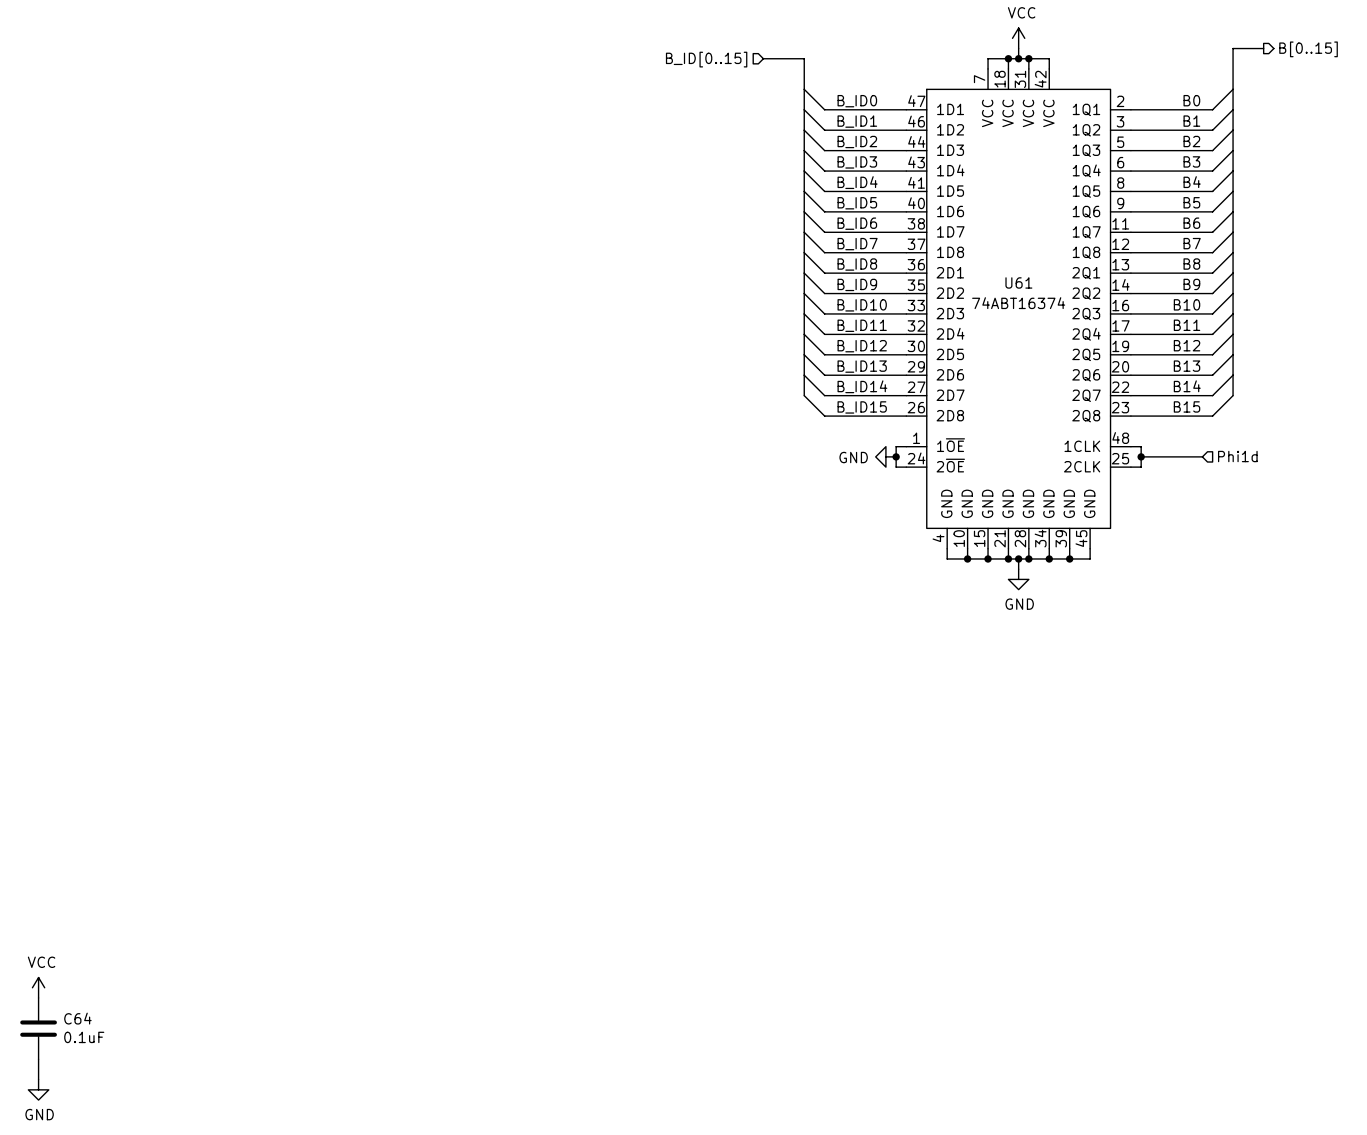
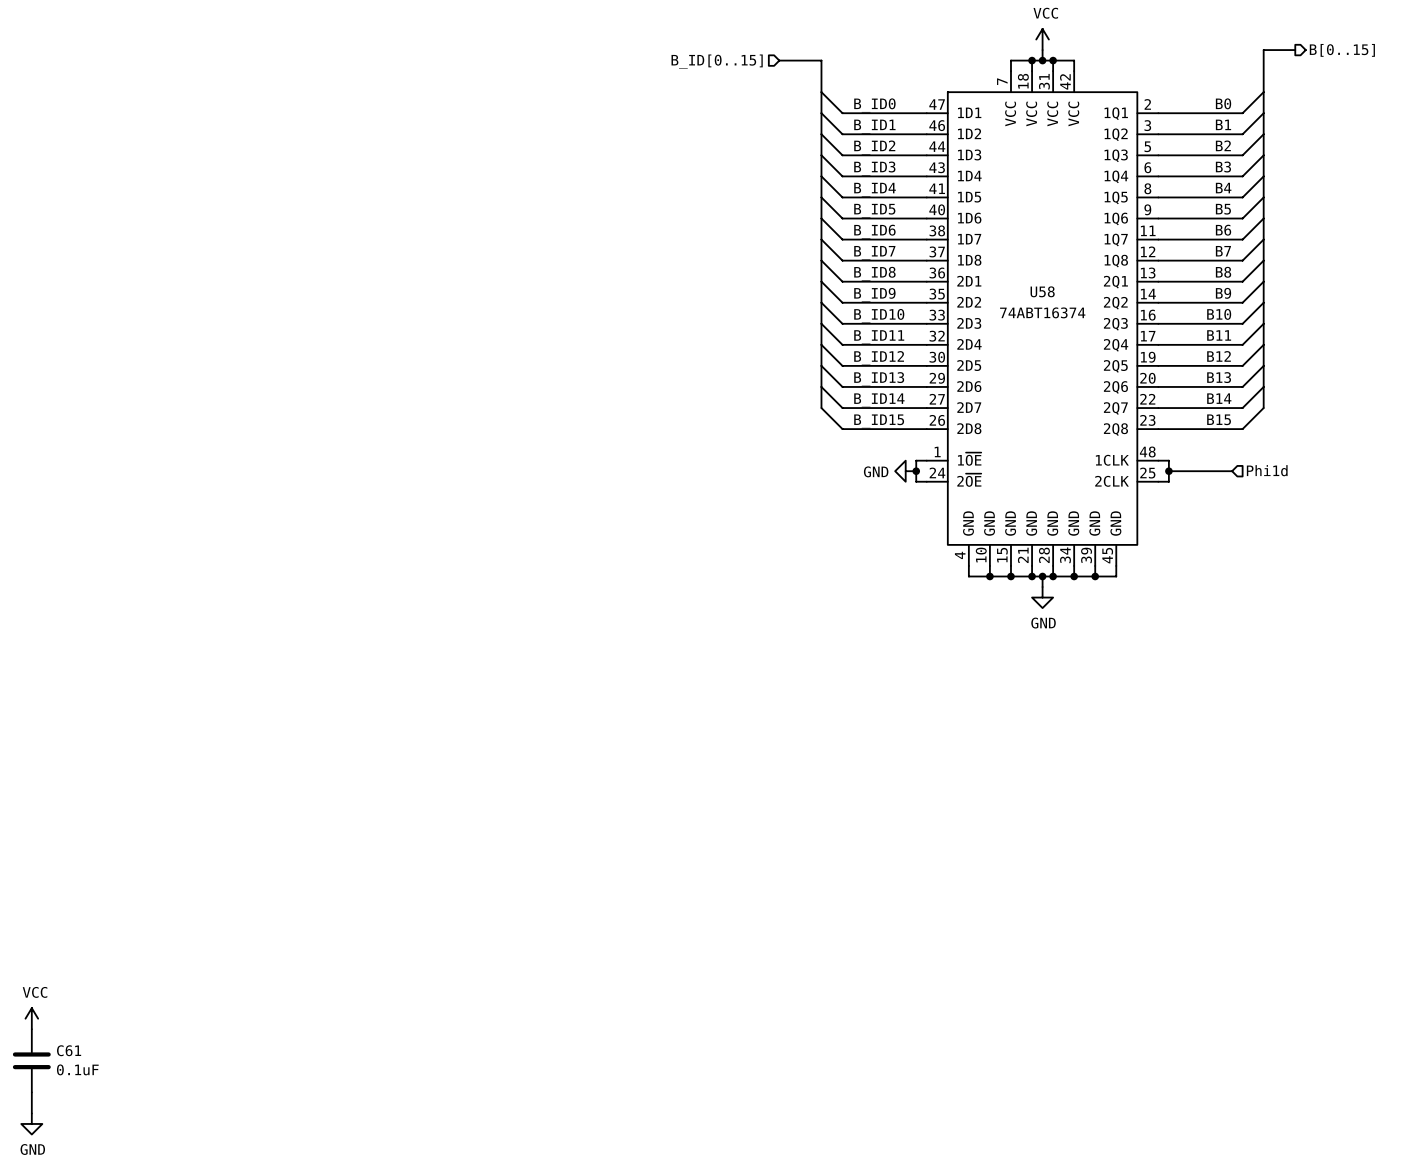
U61 name: U61 (1018, 282) -> U58 (1042, 291)
C64 name: C64 (77, 1018) -> C61 (69, 1050)

